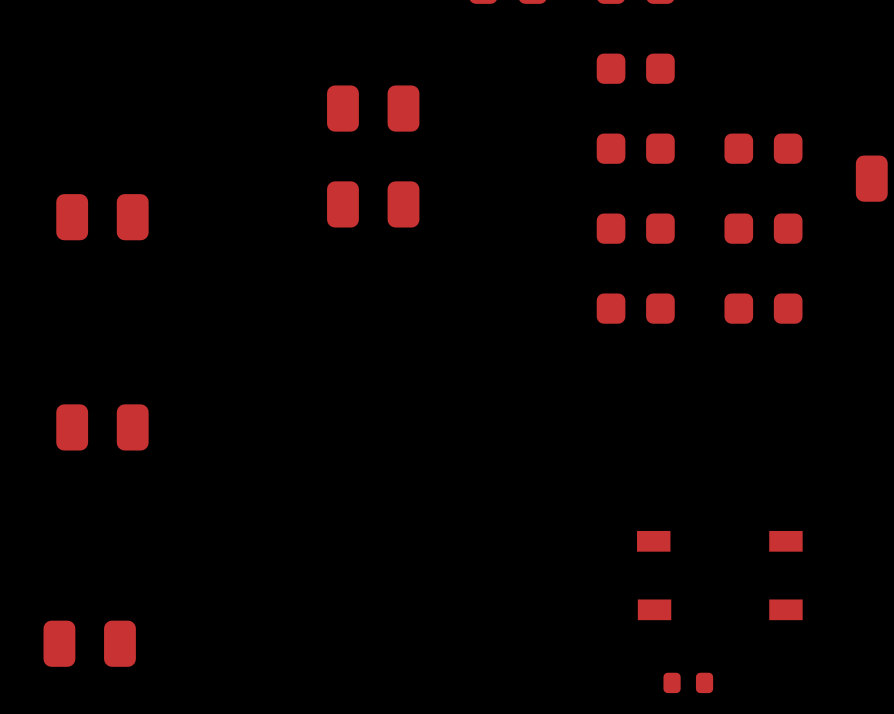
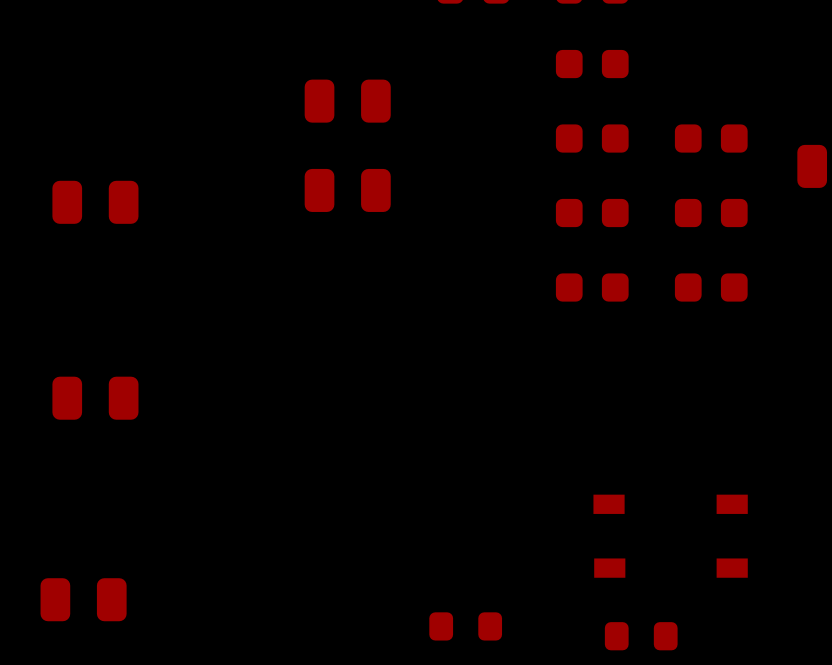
part: none -> (465, 626)
part footprint: [663, 672, 714, 694] -> [604, 622, 678, 651]

